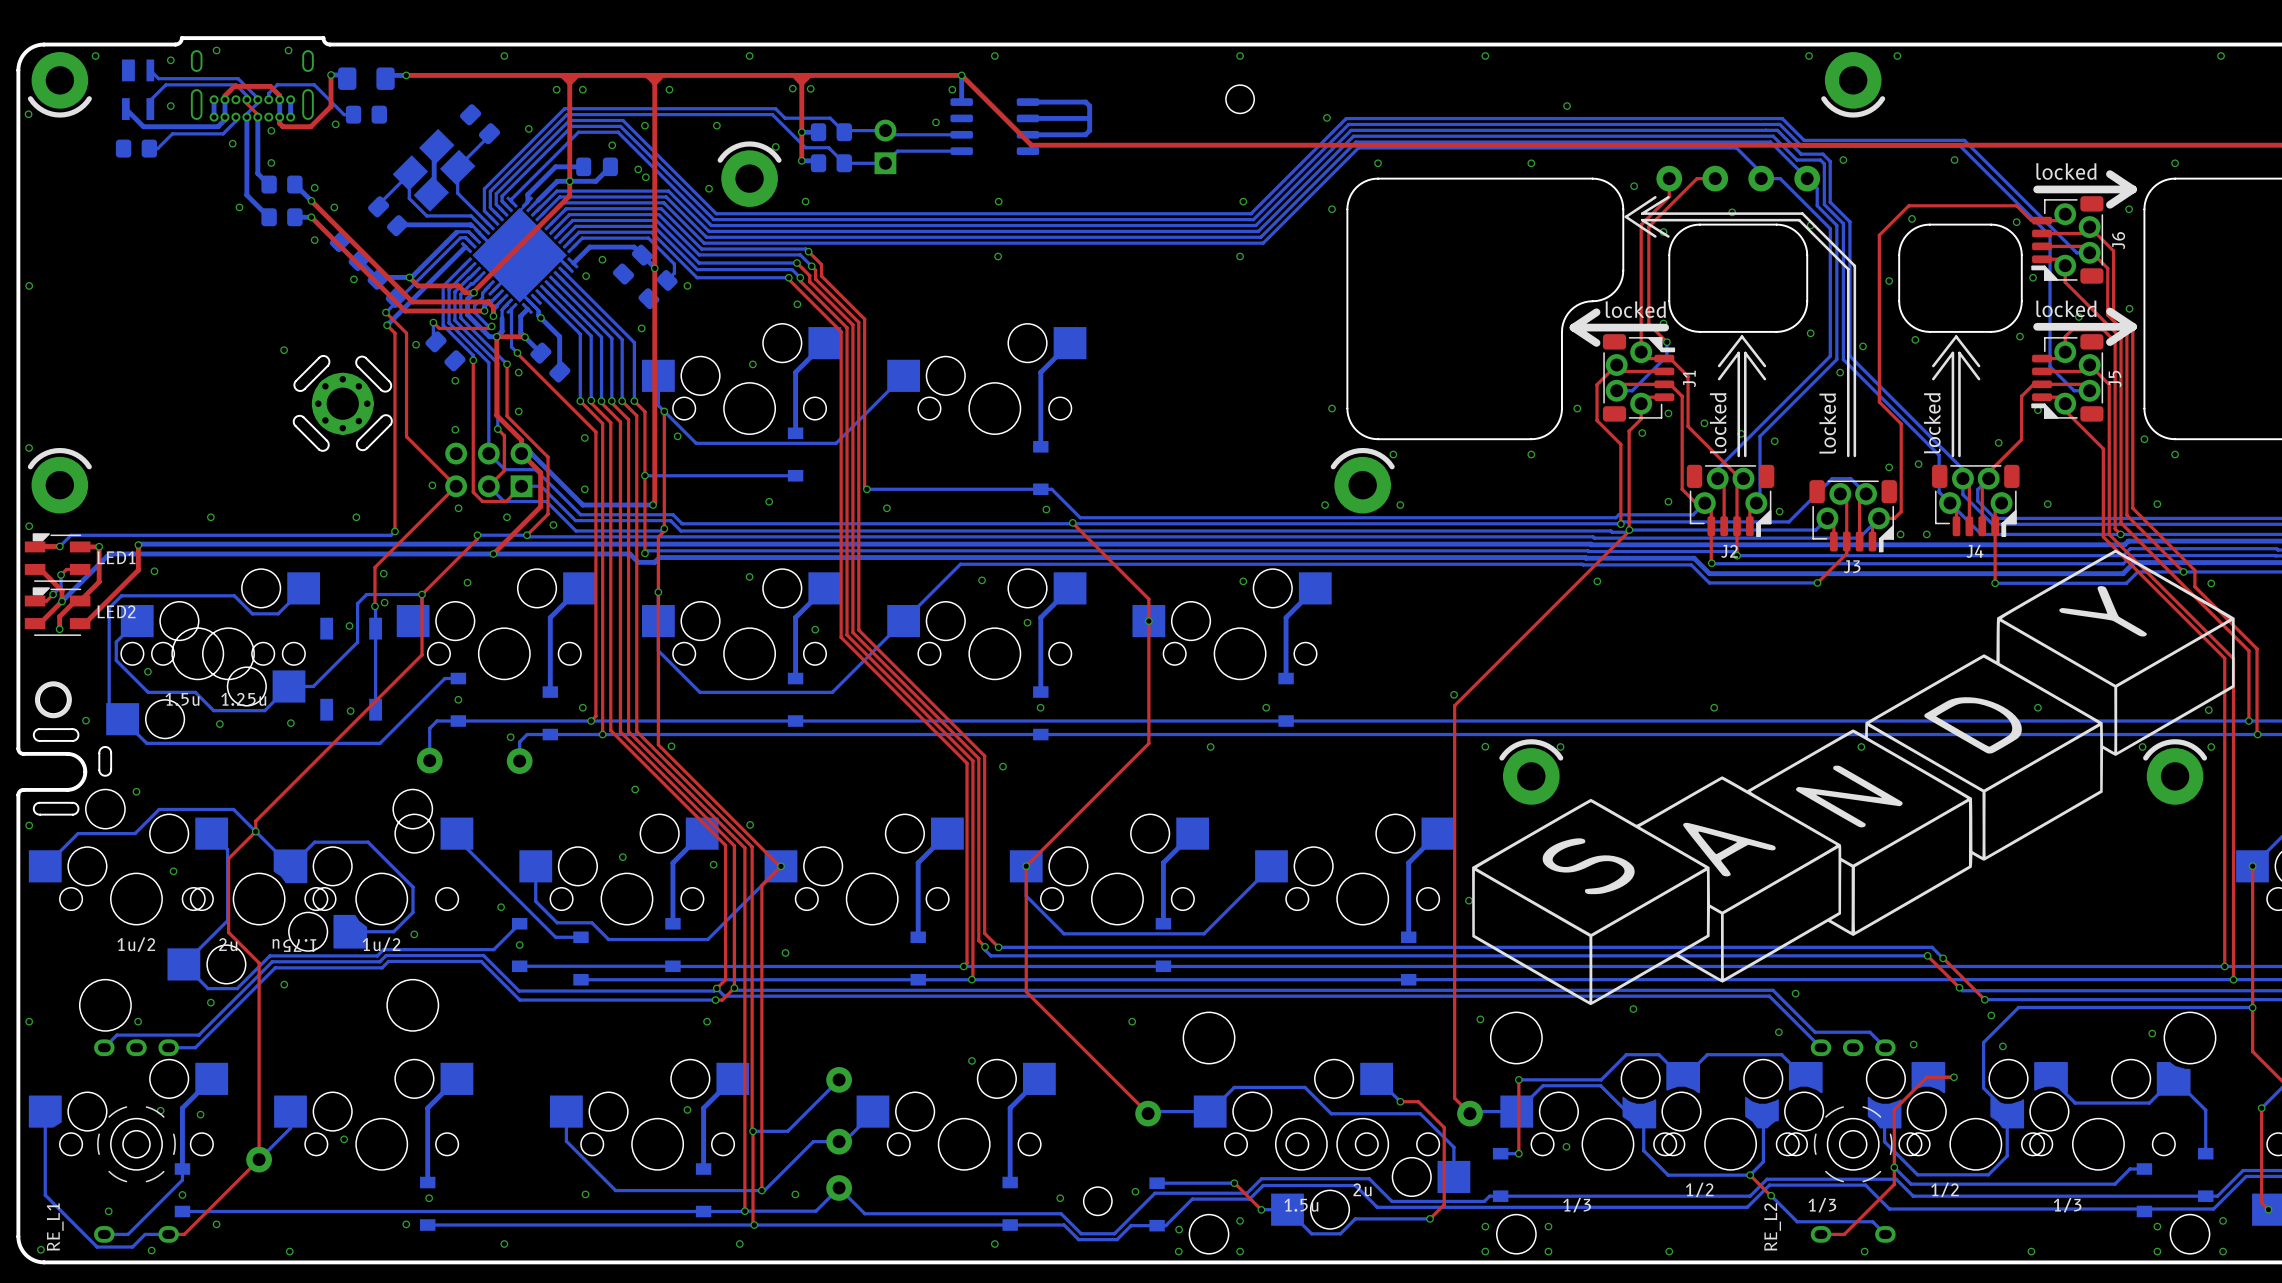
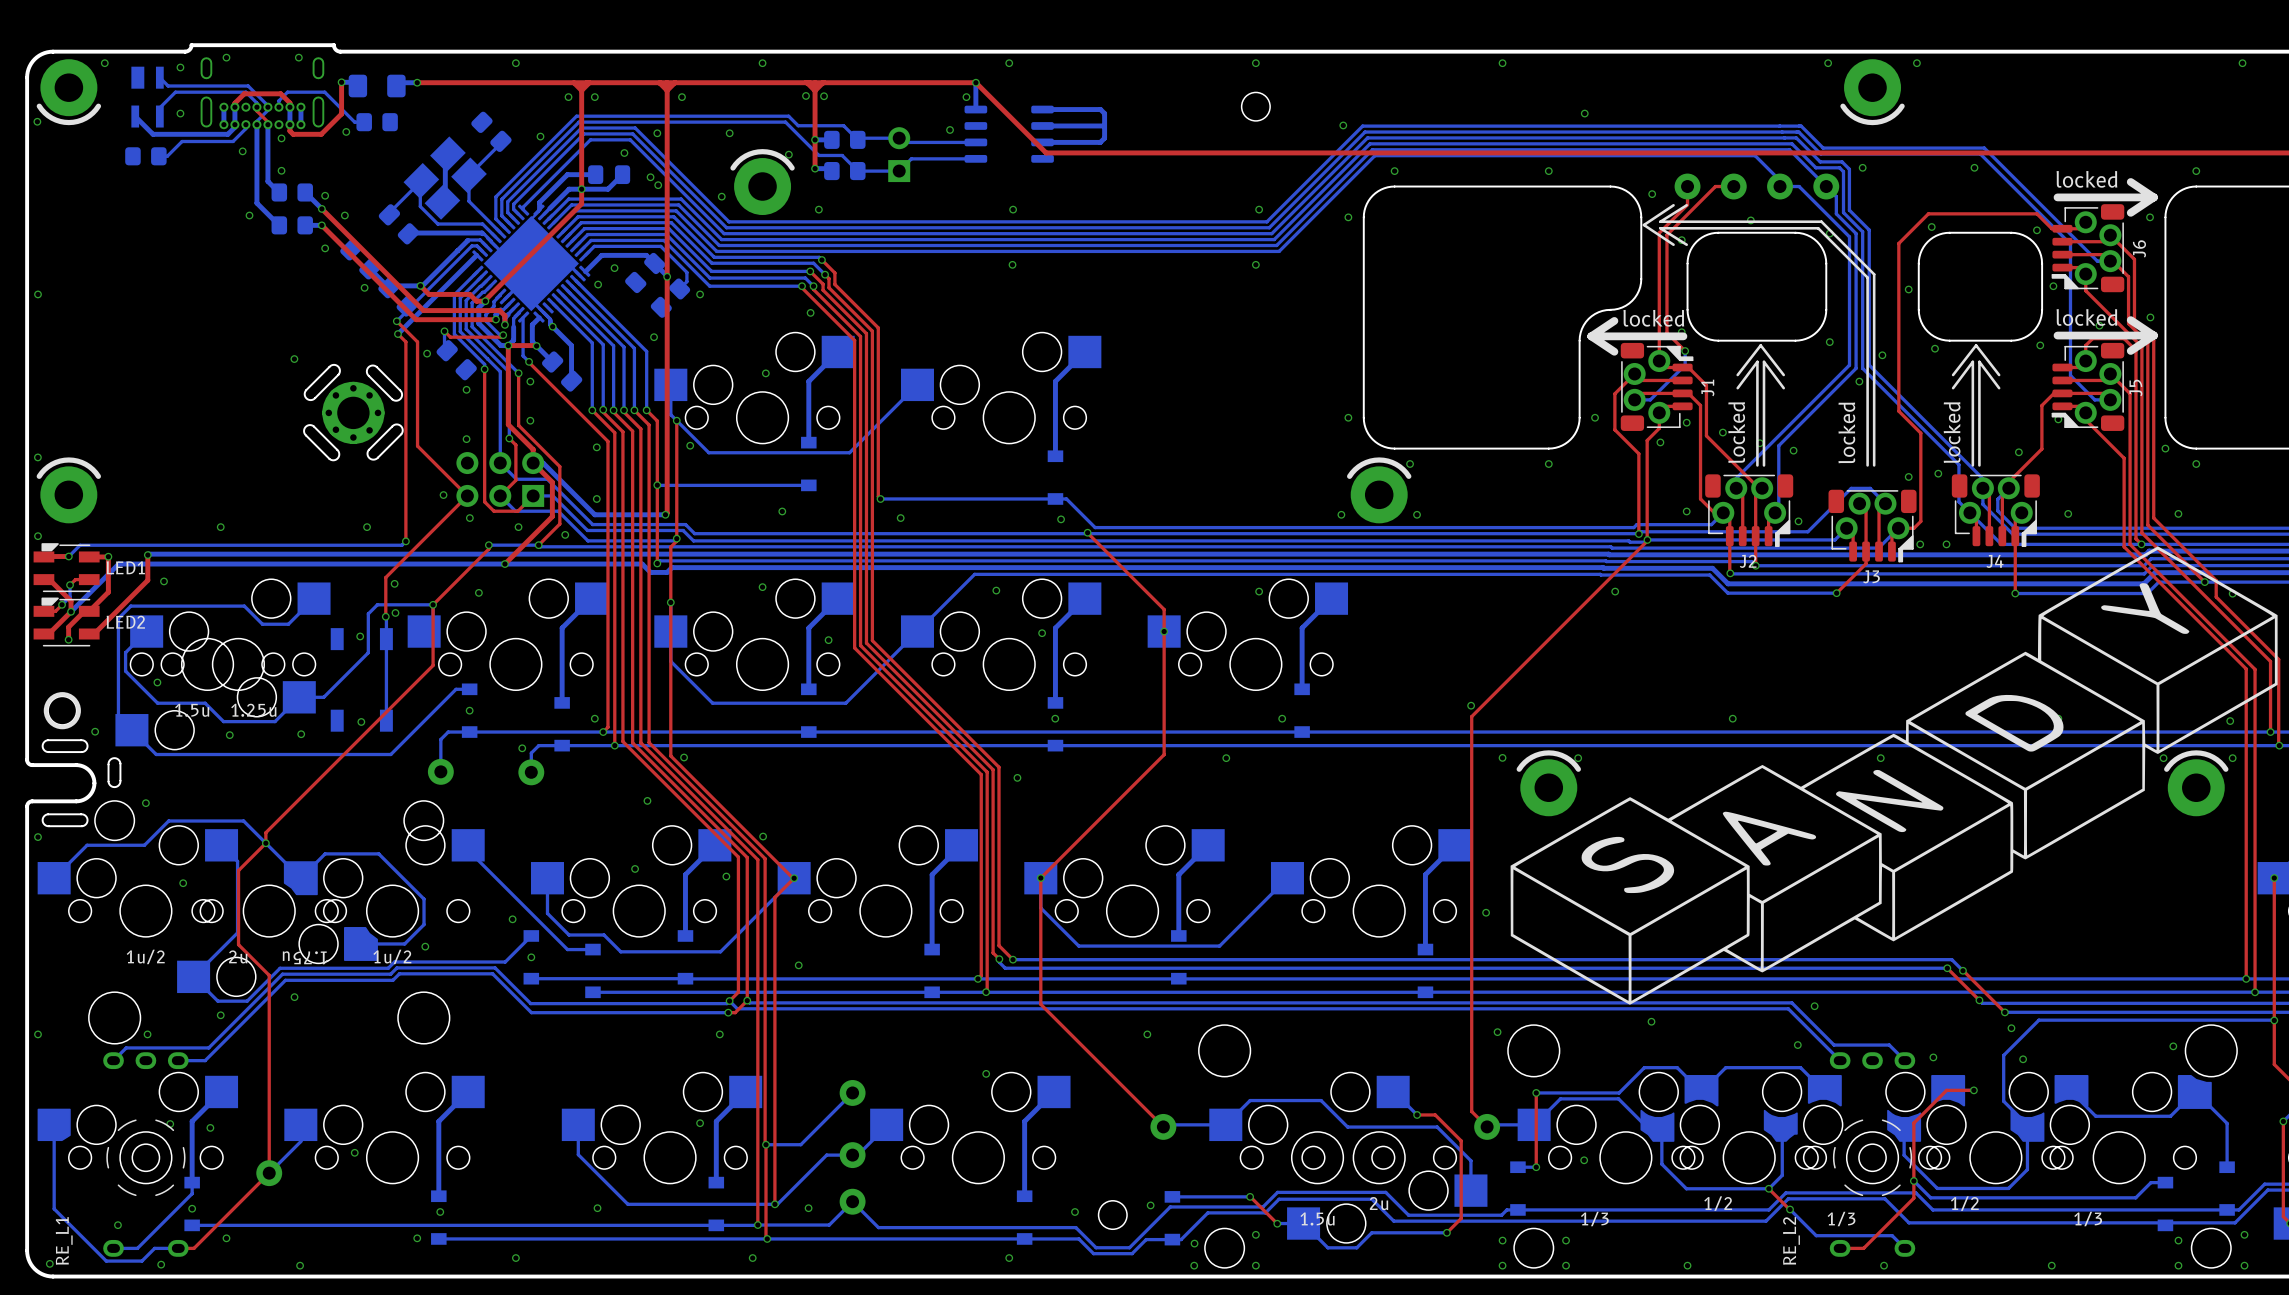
drawing: none -> [1510, 546, 2278, 1005]
drawing: [1472, 549, 2235, 1006] -> none

